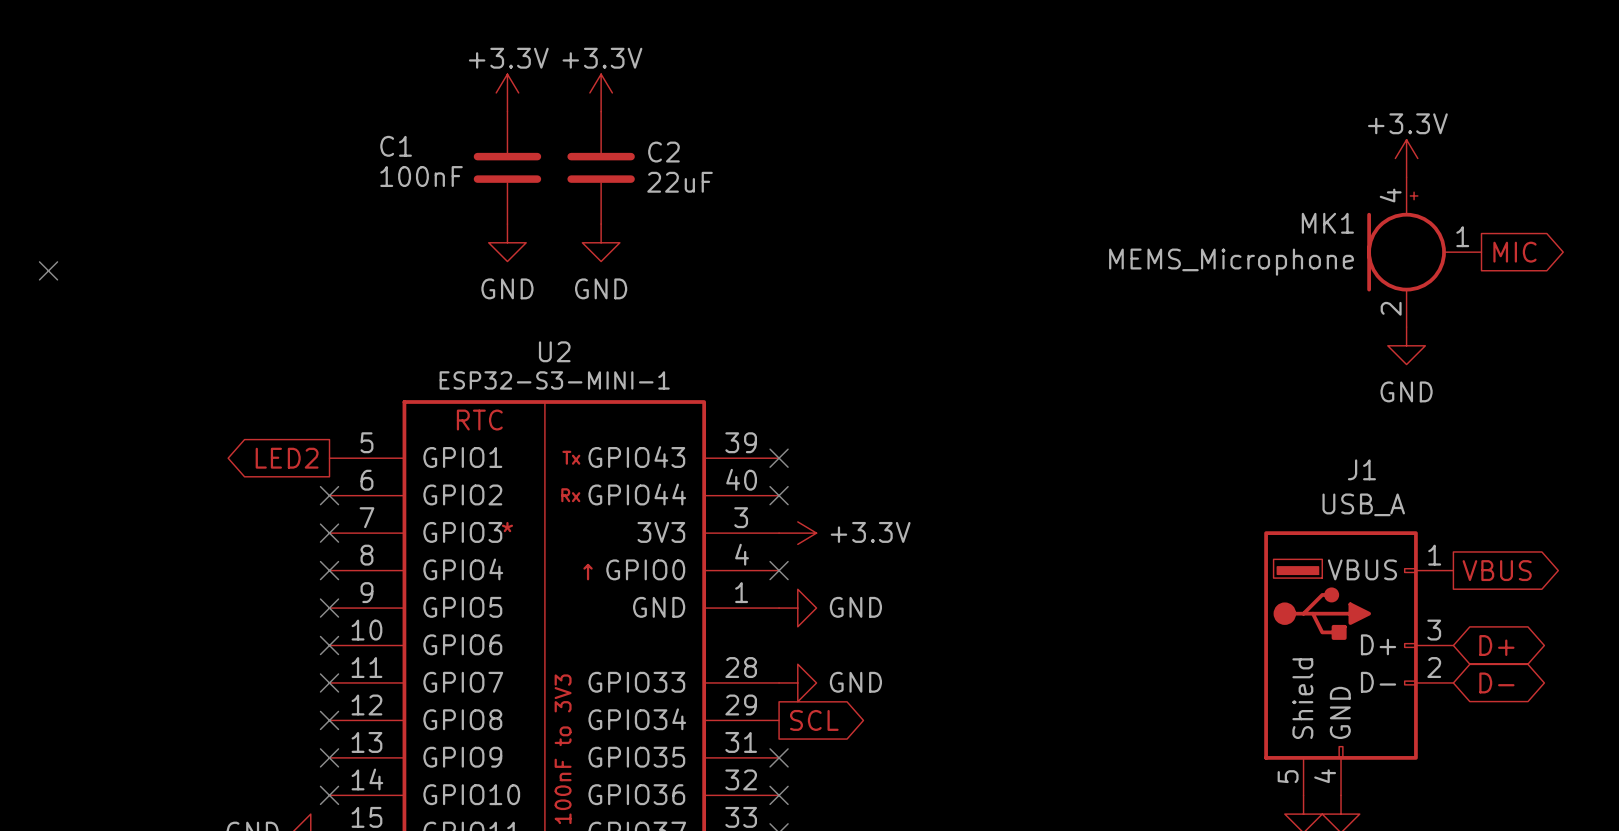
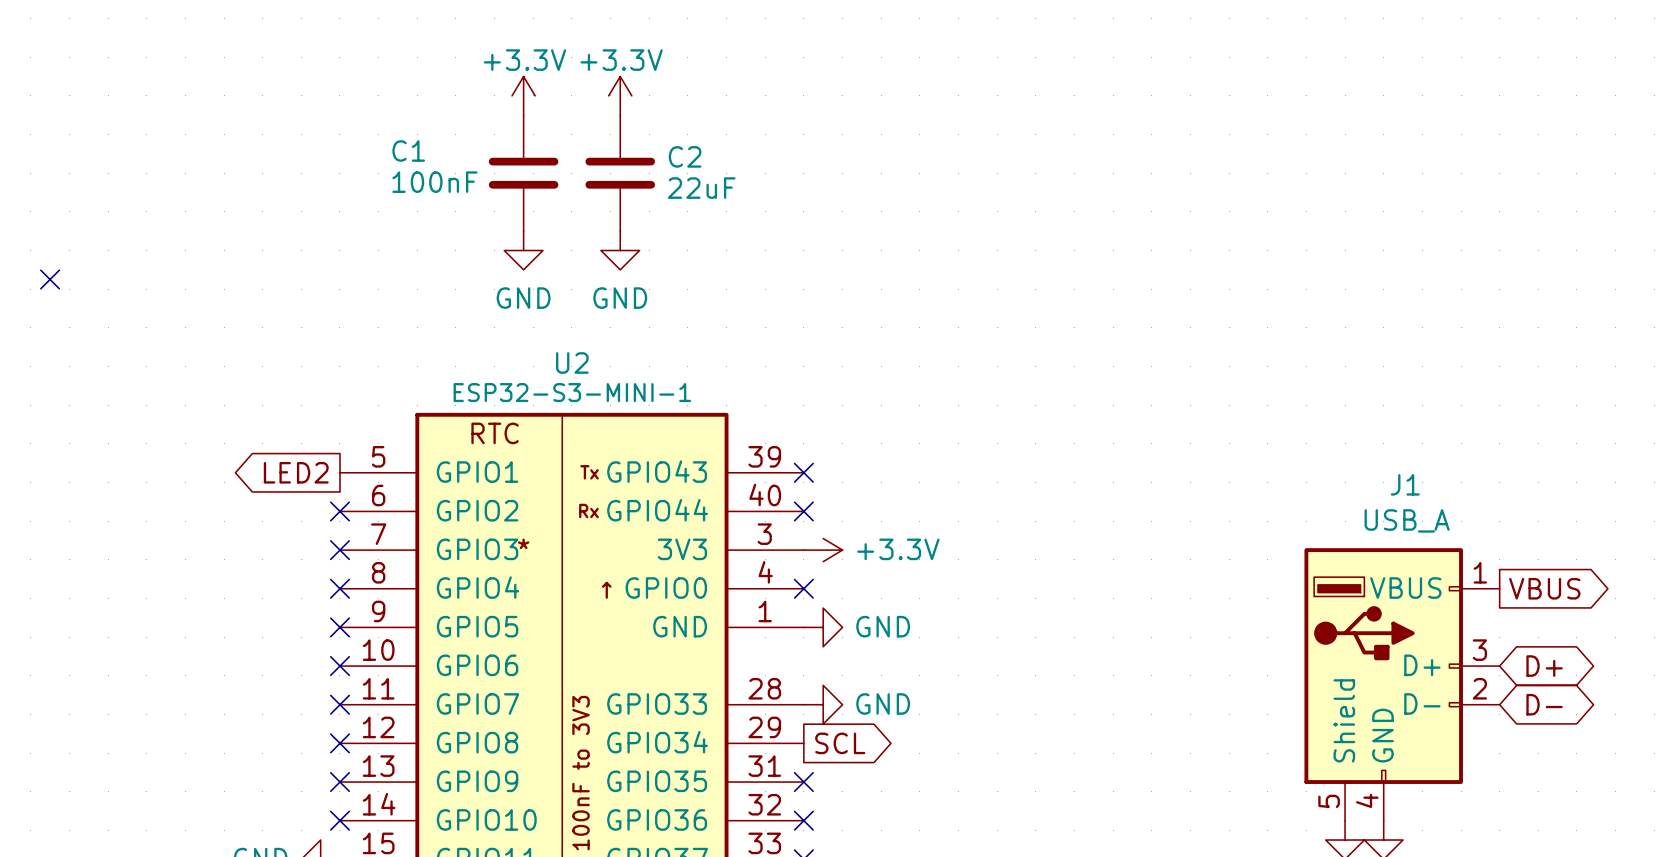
power symbol: +3.3V (1406, 158) -> none
MK1: MEMS_Microphone (1424, 252) -> none
global label: MIC (1514, 252) -> none
power symbol: GND (1406, 345) -> none

